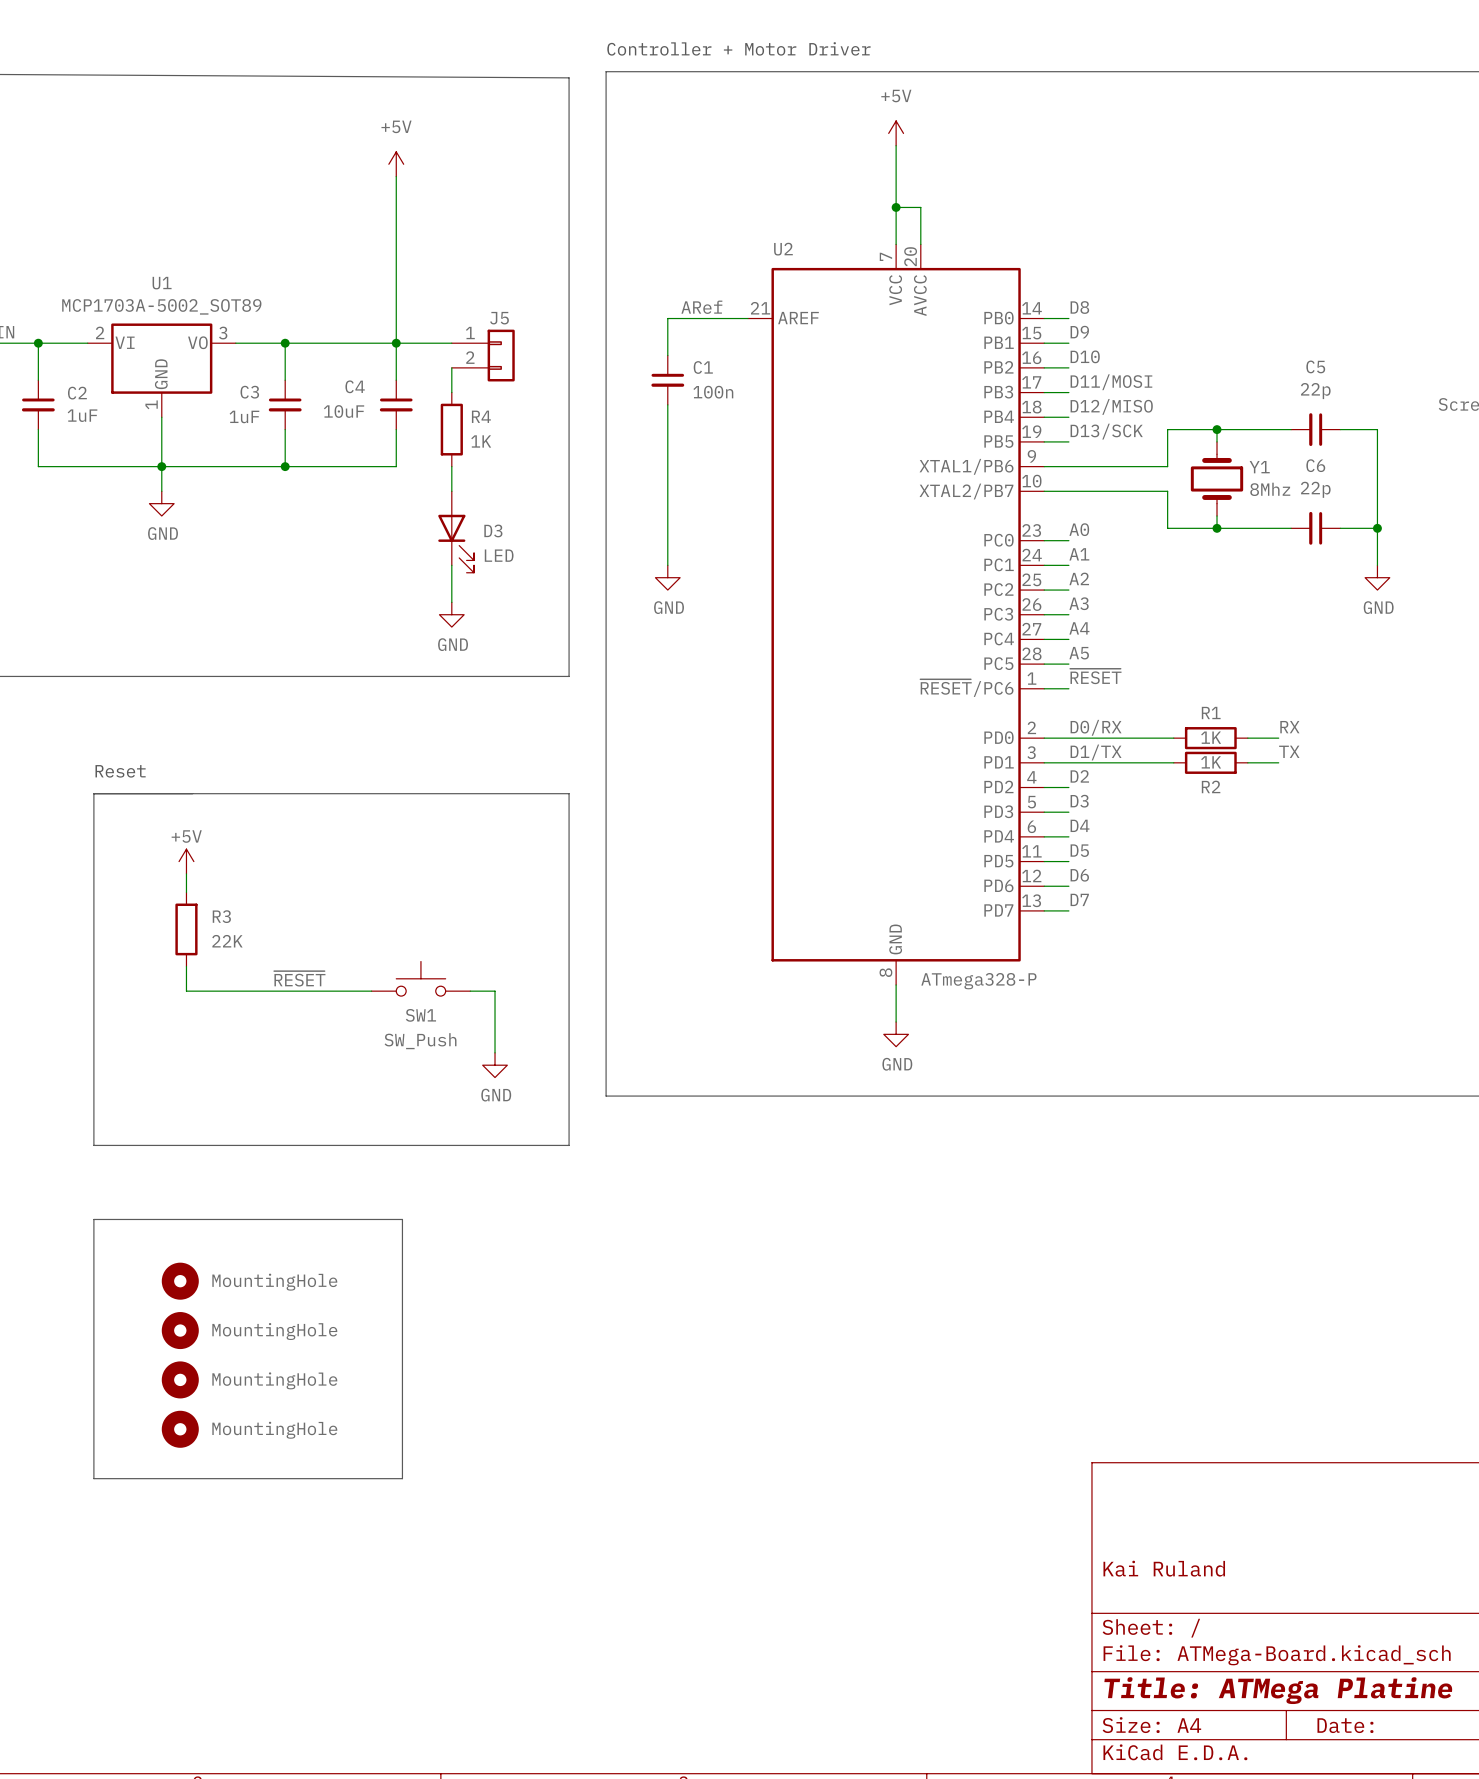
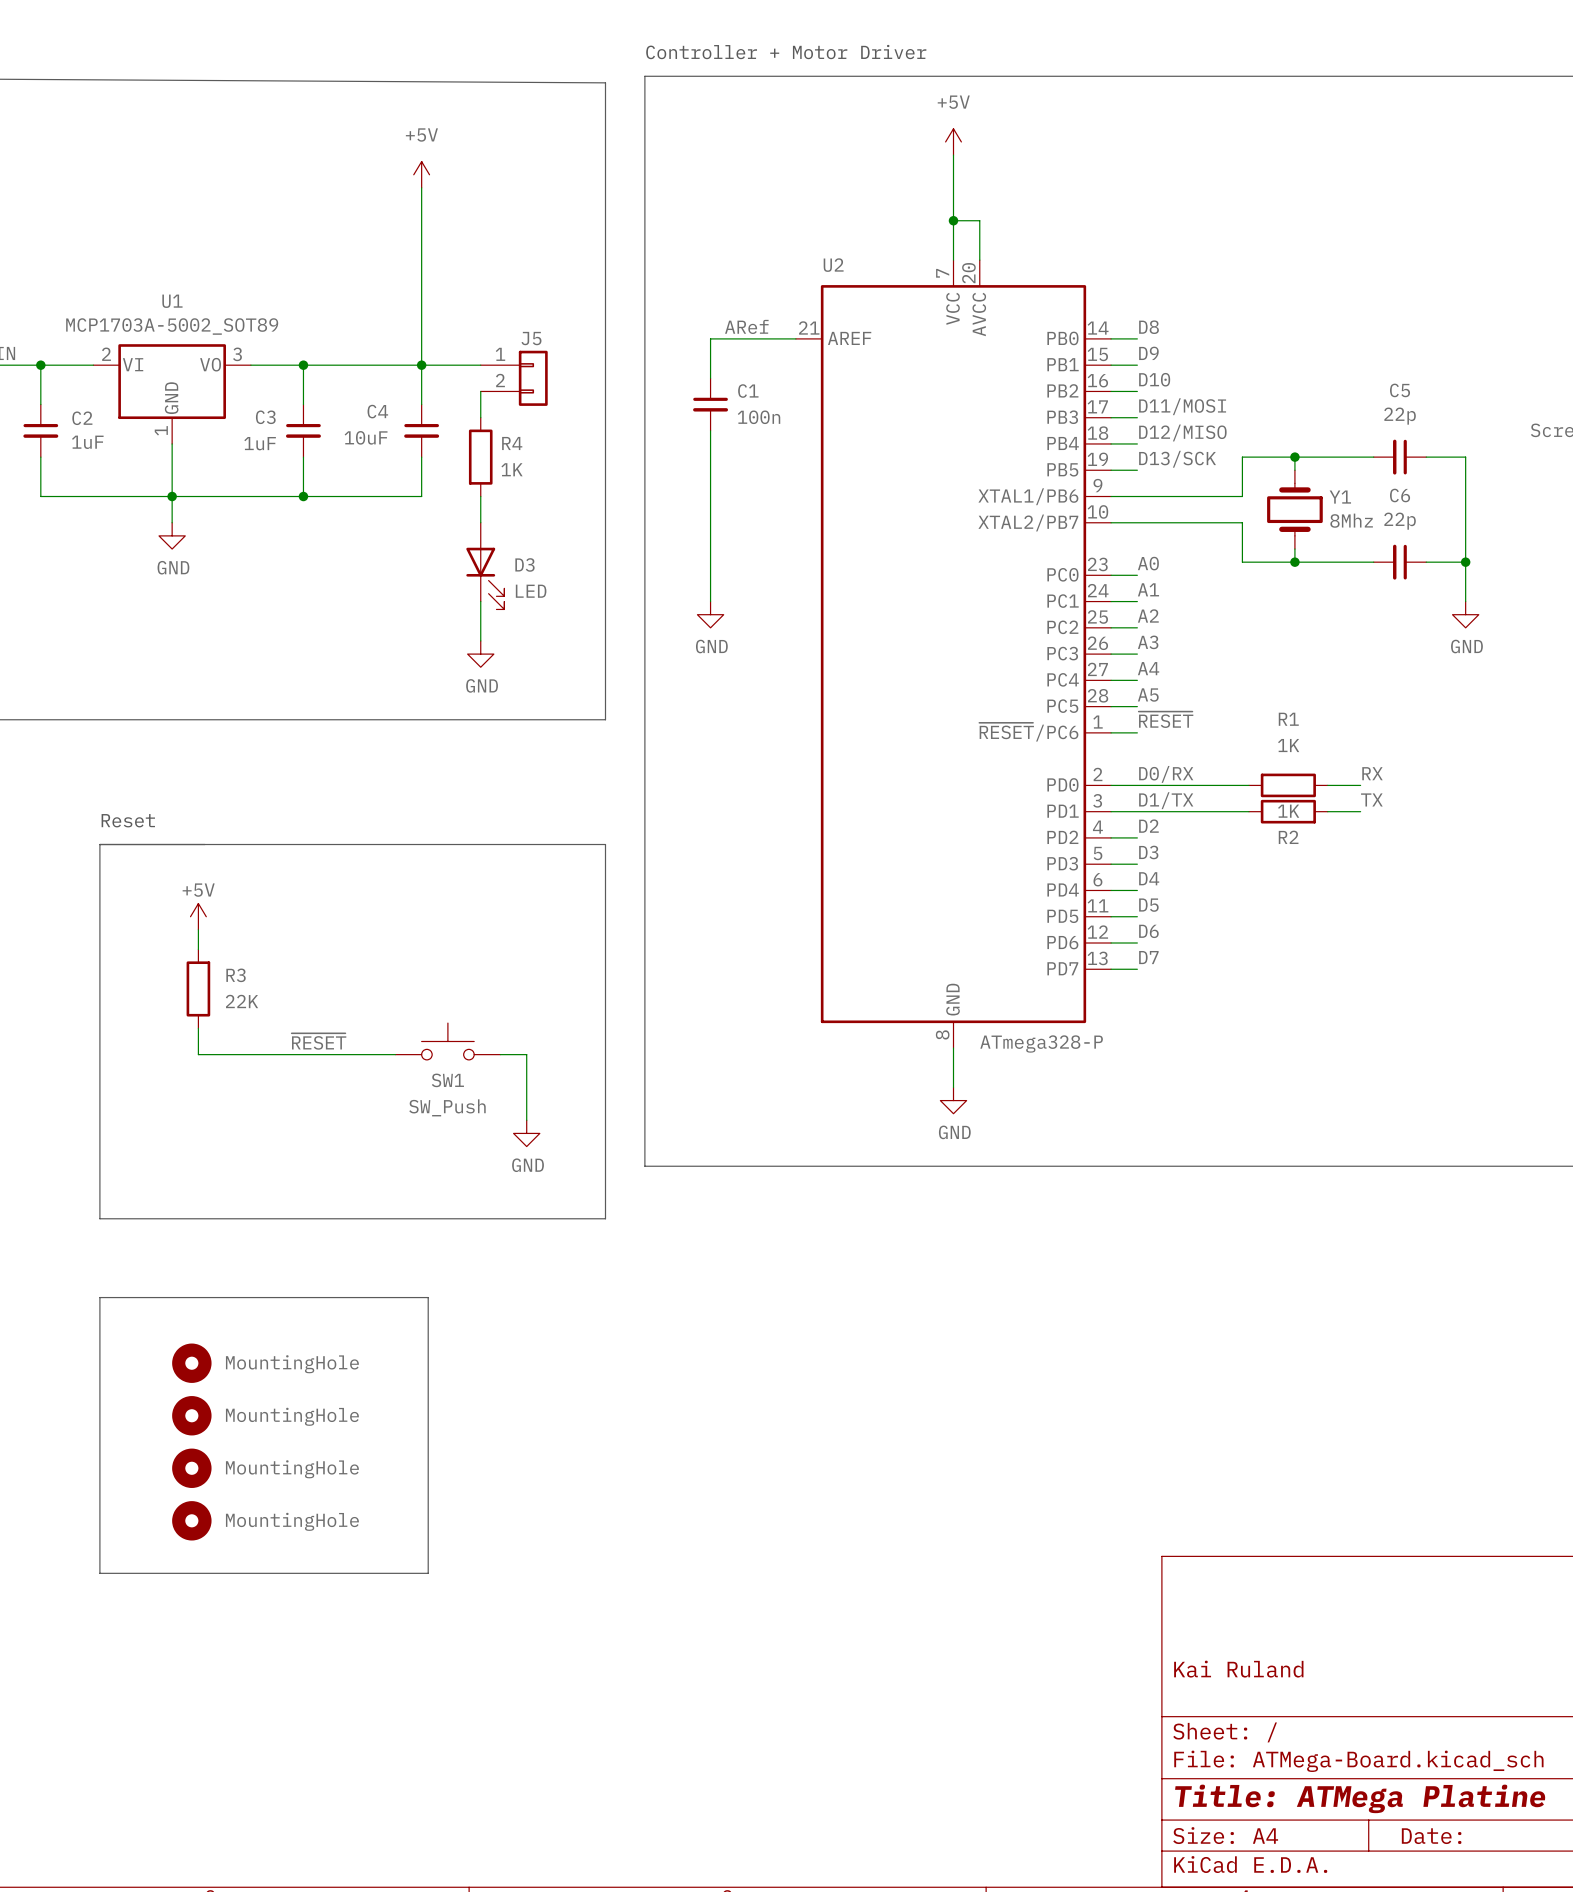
R1 name position: R1 (1211, 713) -> R1 (1288, 719)
R1 value position: 1K (1211, 737) -> 1K (1288, 745)

